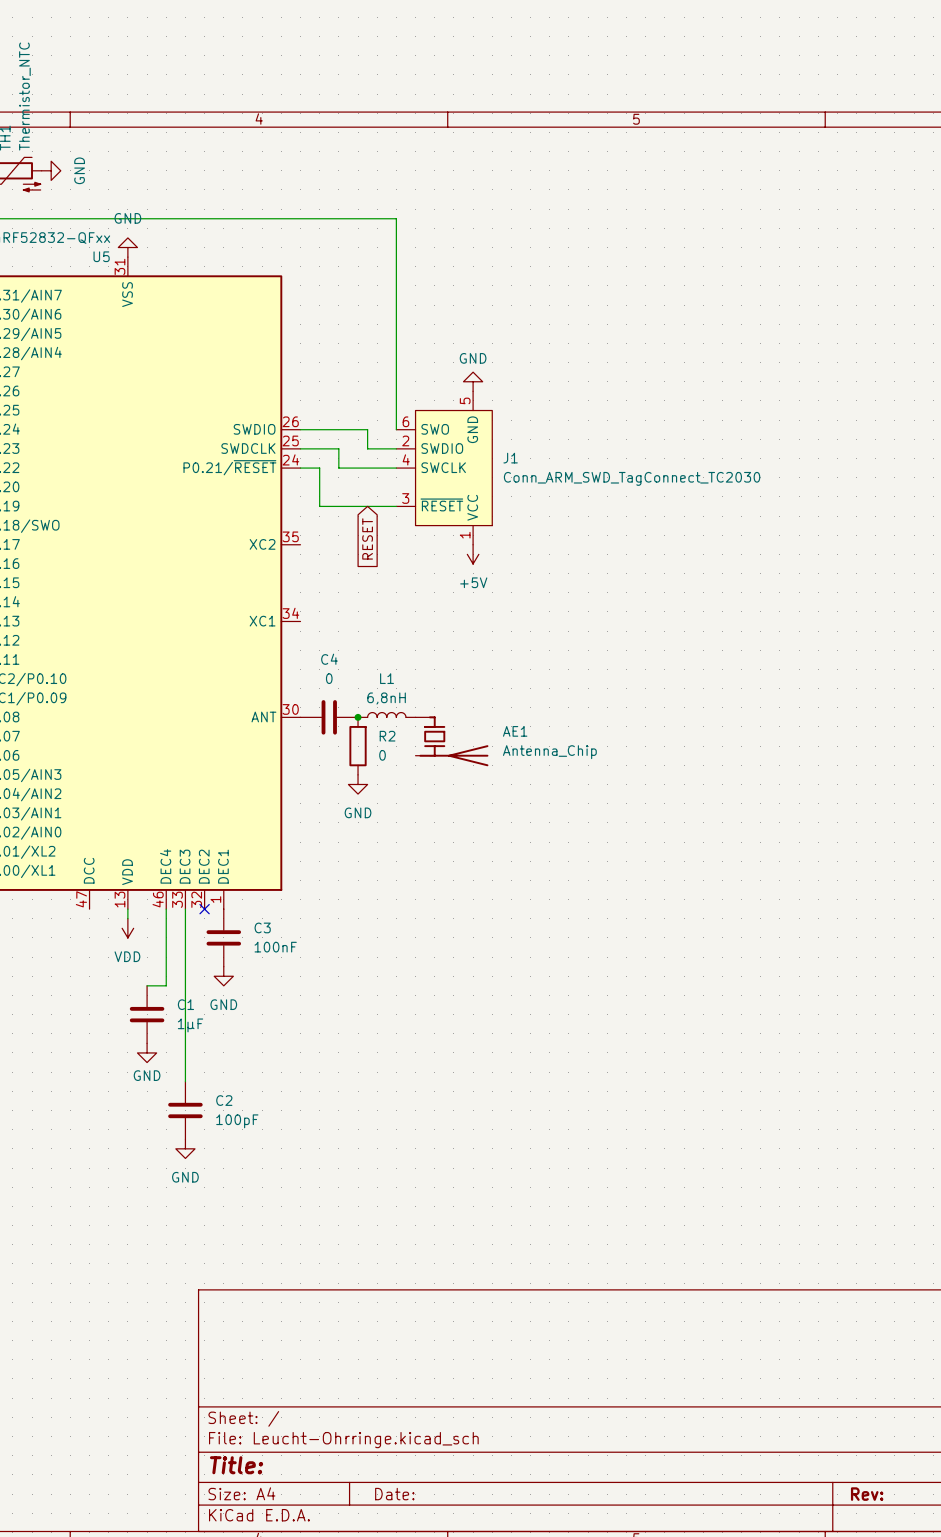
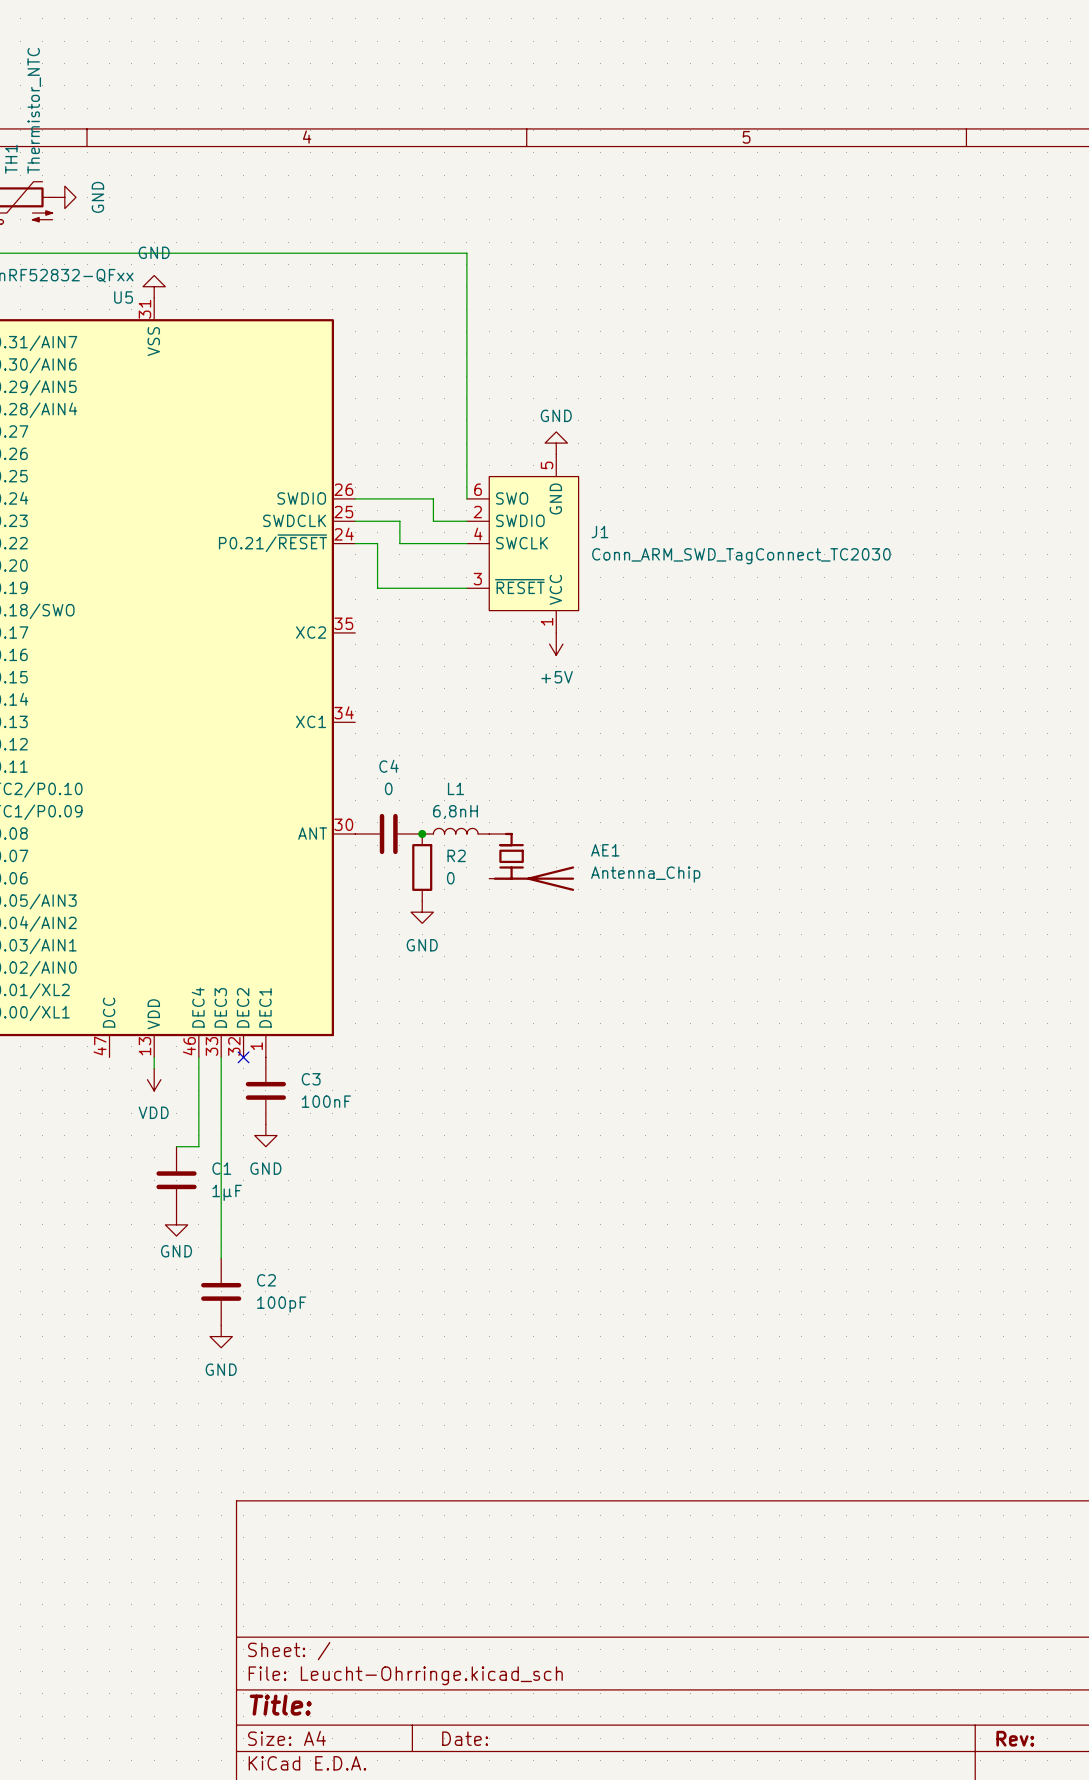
global label: RESET (367, 538) -> none

